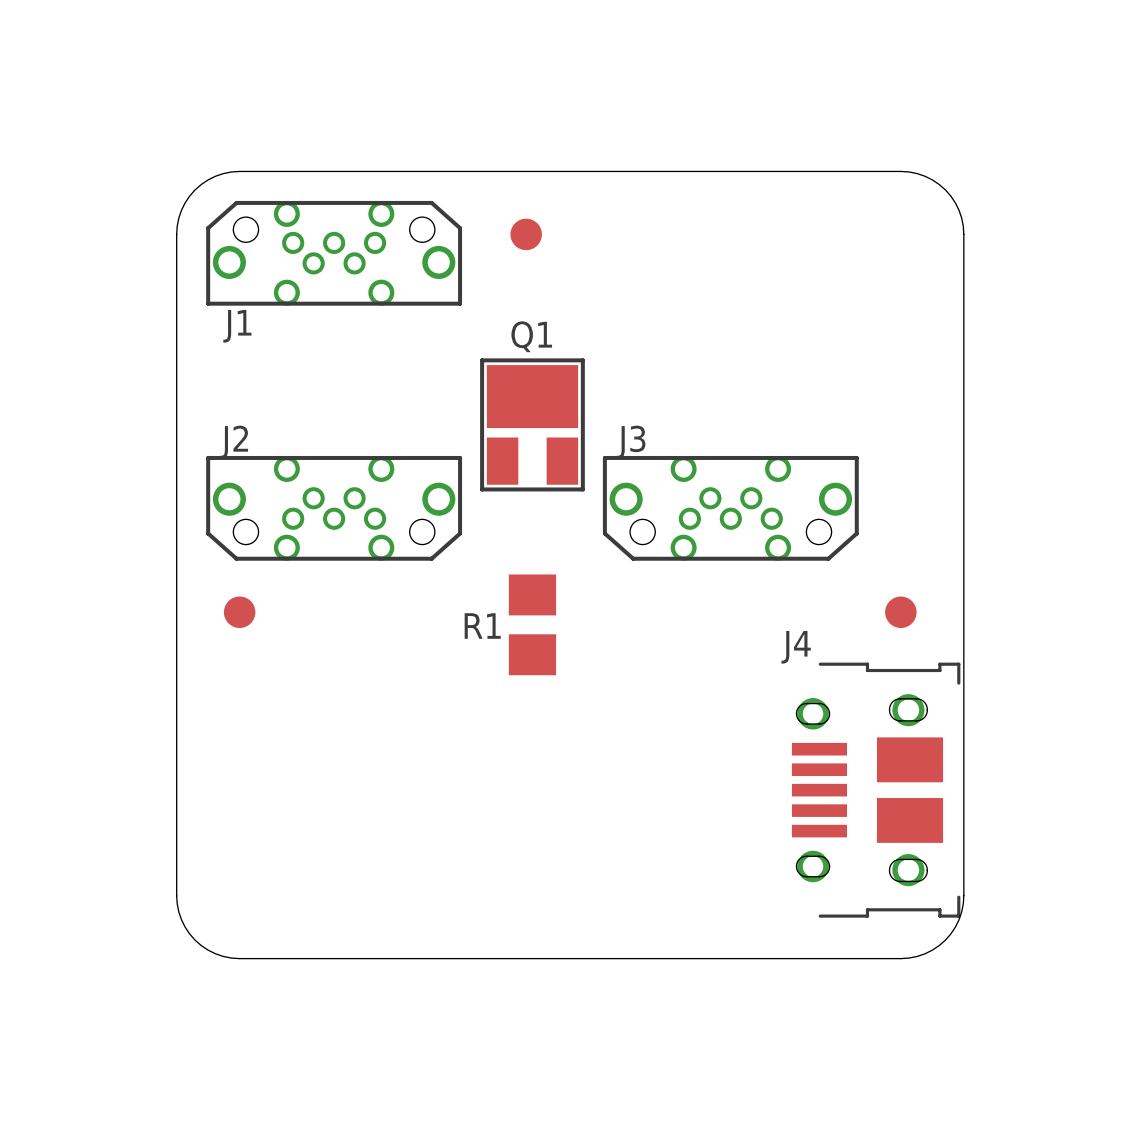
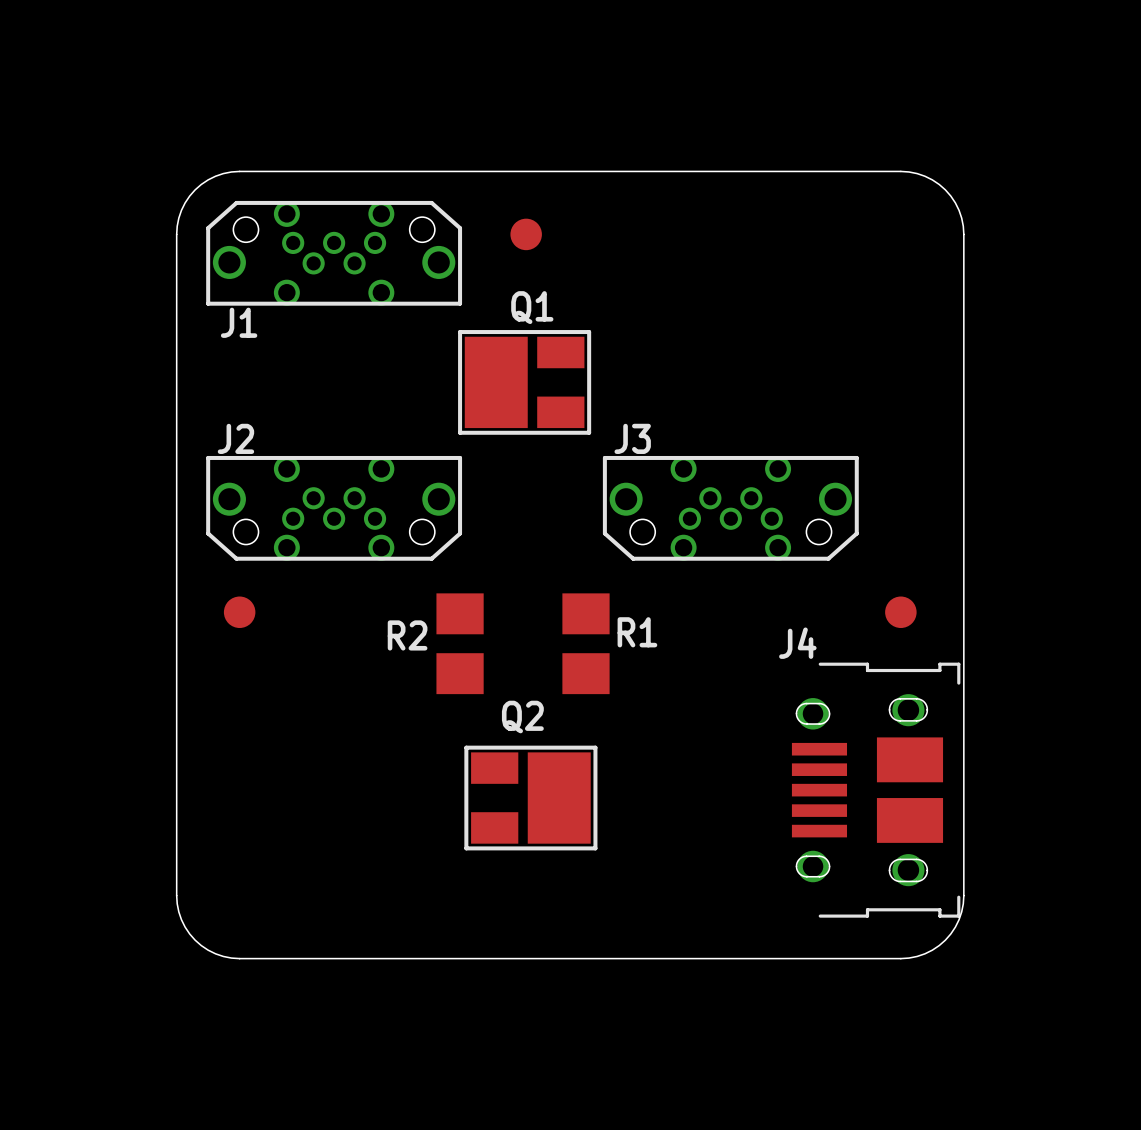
Q1 rotation: 0° (532, 424) -> 90° counterclockwise (524, 382)
R1 position: (532, 624) -> (586, 643)
R1 name position: R1 (482, 626) -> R1 (637, 632)
R2: none -> (460, 643)
Q2: none -> (530, 798)

